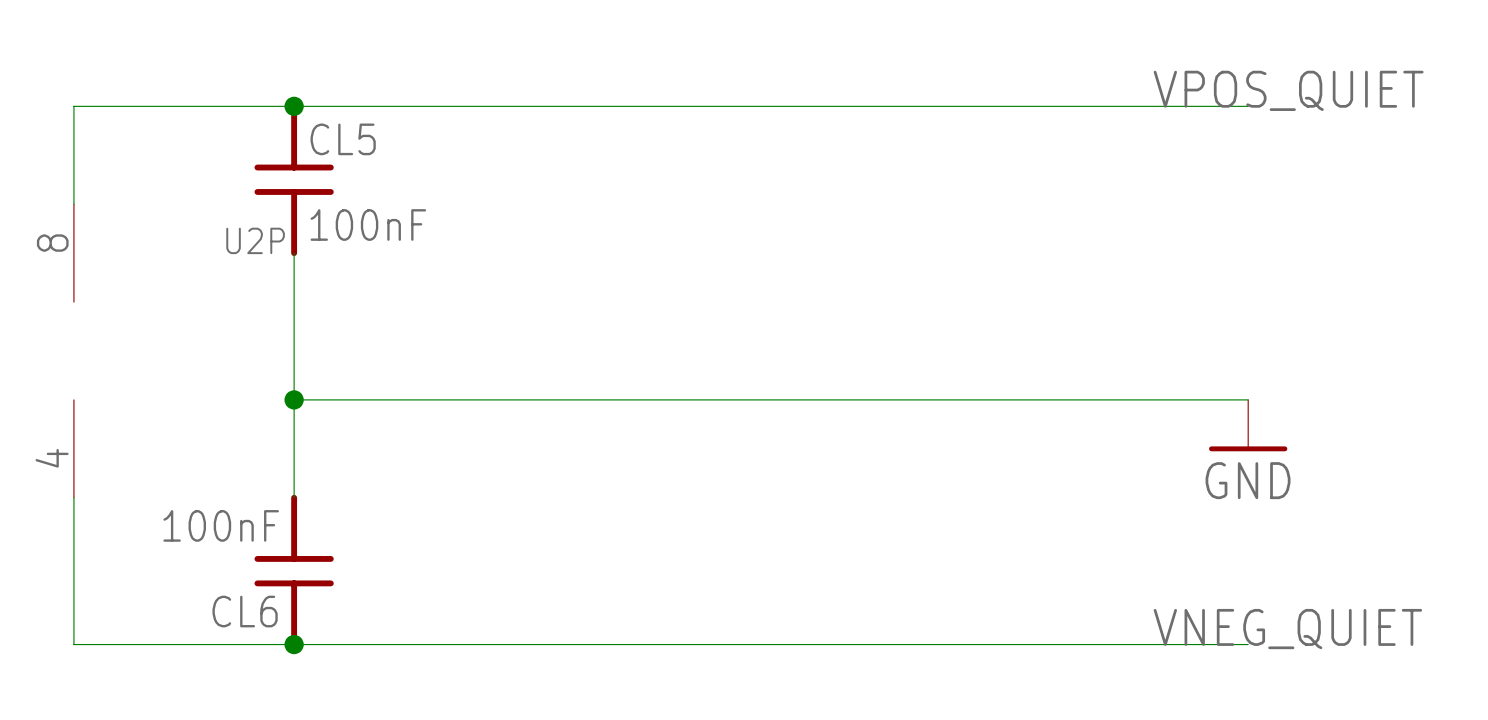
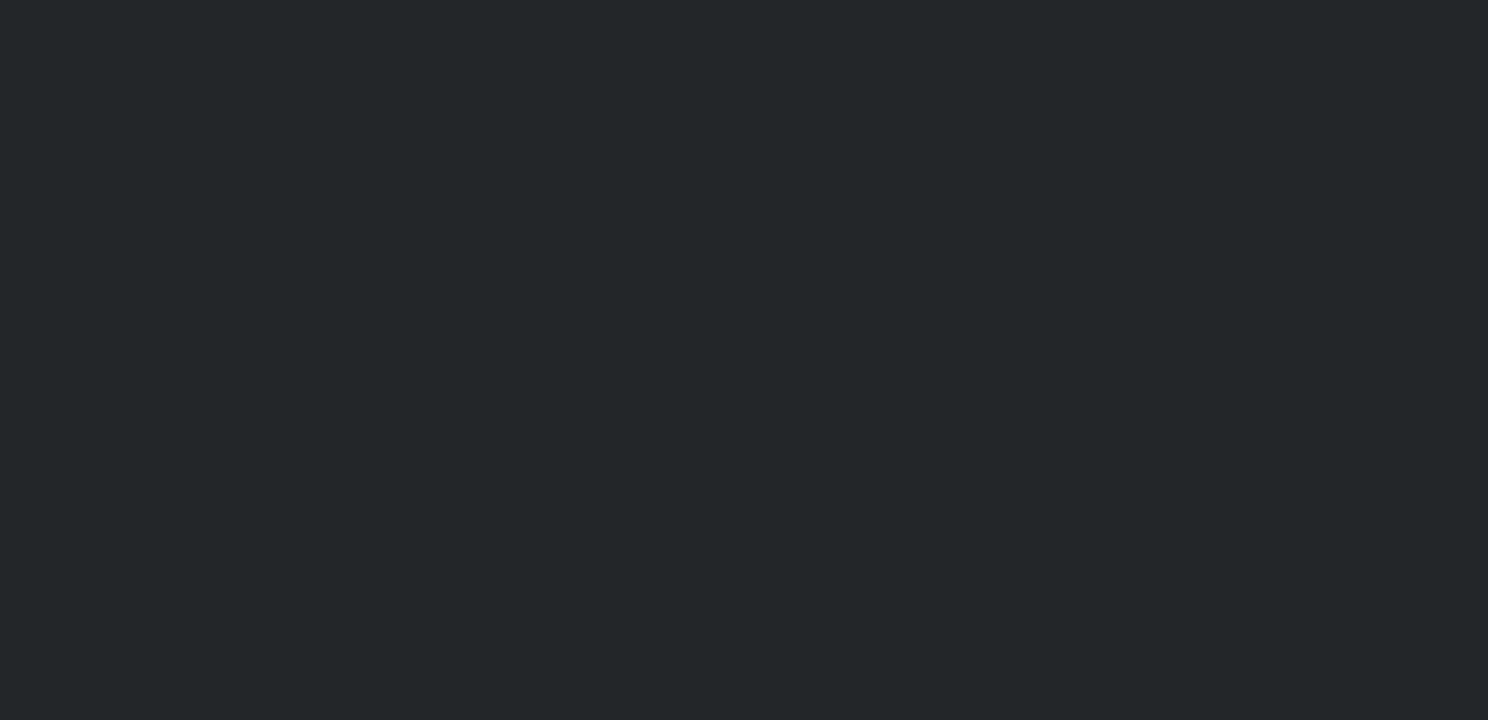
label: VPOS_QUIET (1288, 90) -> none
junction: (294, 106) -> none
wire: (1248, 106) (73, 106) (73, 204) -> none
CL5: 100nF (294, 179) -> none
wire: (294, 253) (294, 497) -> none
U2P: (73, 350) -> none
wire: (294, 399) (1248, 399) -> none
junction: (294, 399) -> none
power symbol: GND (1248, 425) -> none
wire: (73, 497) (73, 644) (1248, 644) -> none
CL6: 100nF (294, 571) -> none
label: VNEG_QUIET (1287, 629) -> none
junction: (294, 644) -> none

